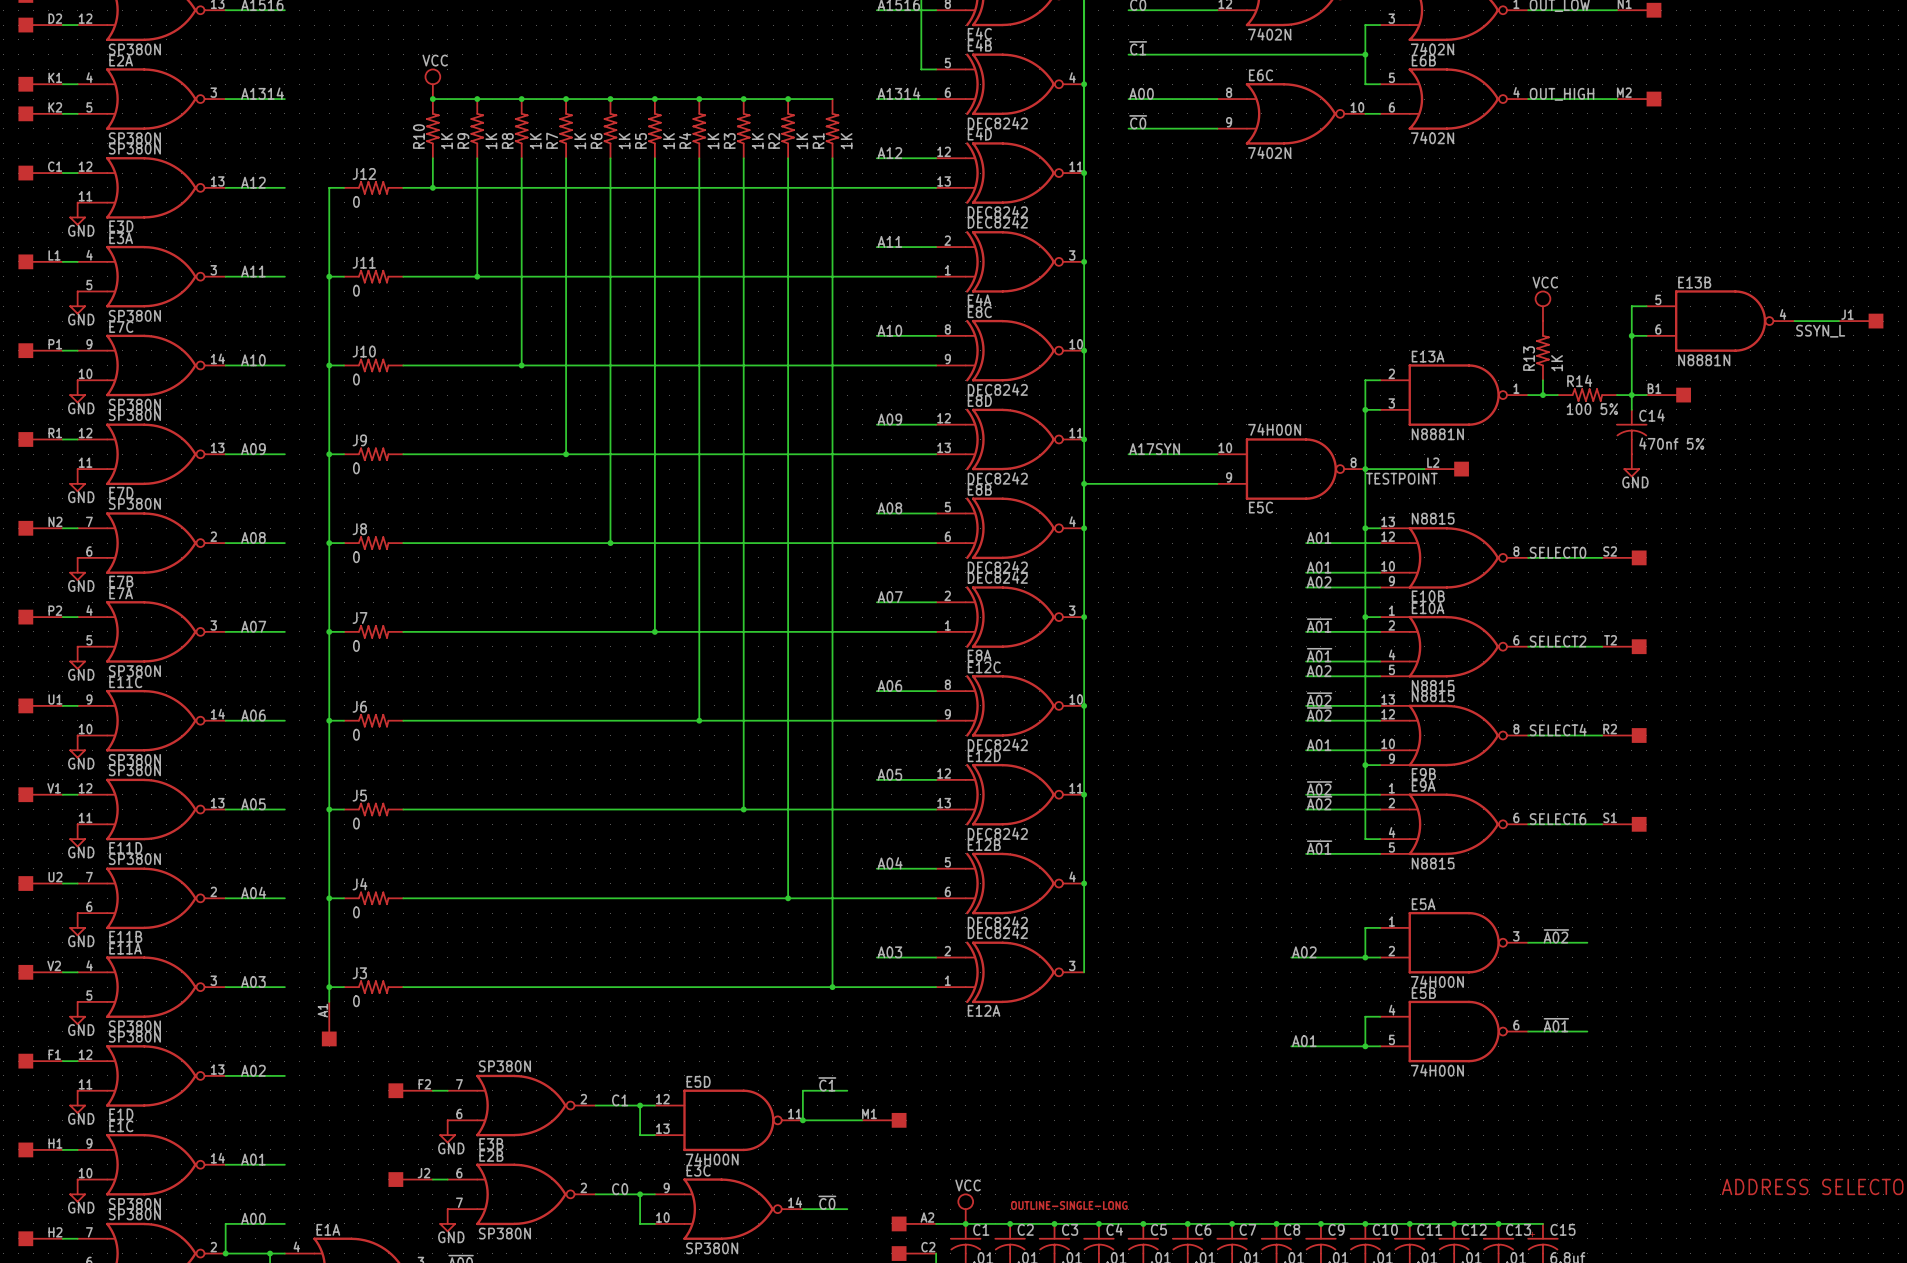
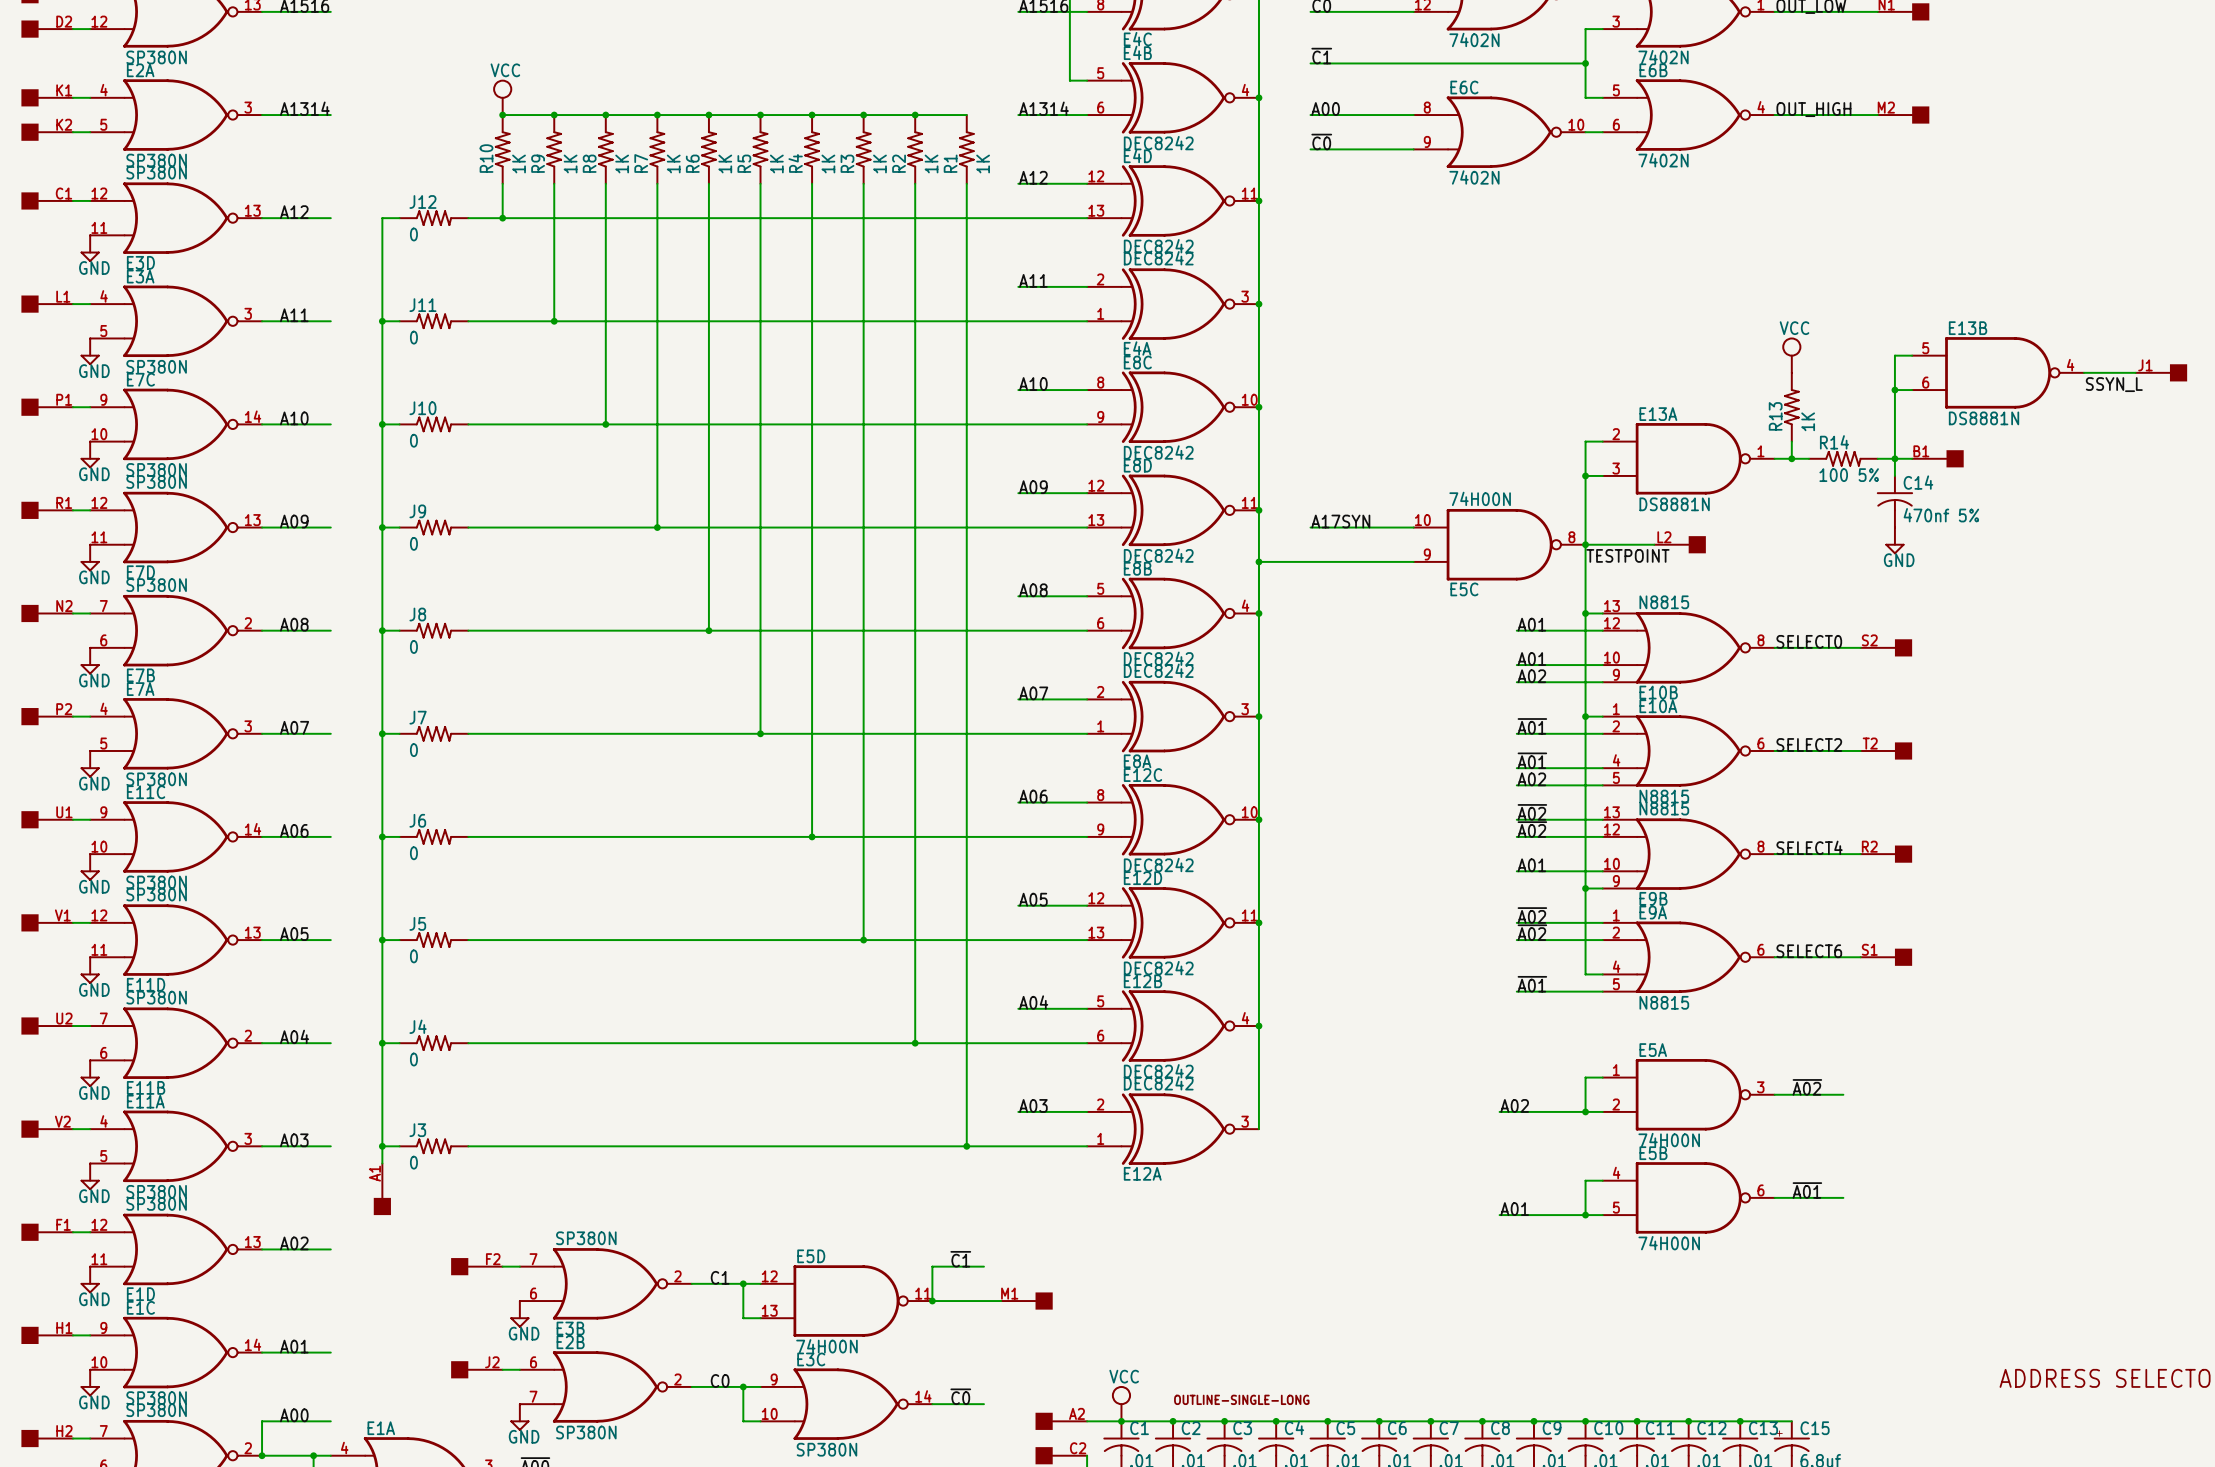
E13B value: N8881N (1704, 360) -> DS8881N (1984, 418)
E13A value: N8881N (1437, 434) -> DS8881N (1674, 504)

